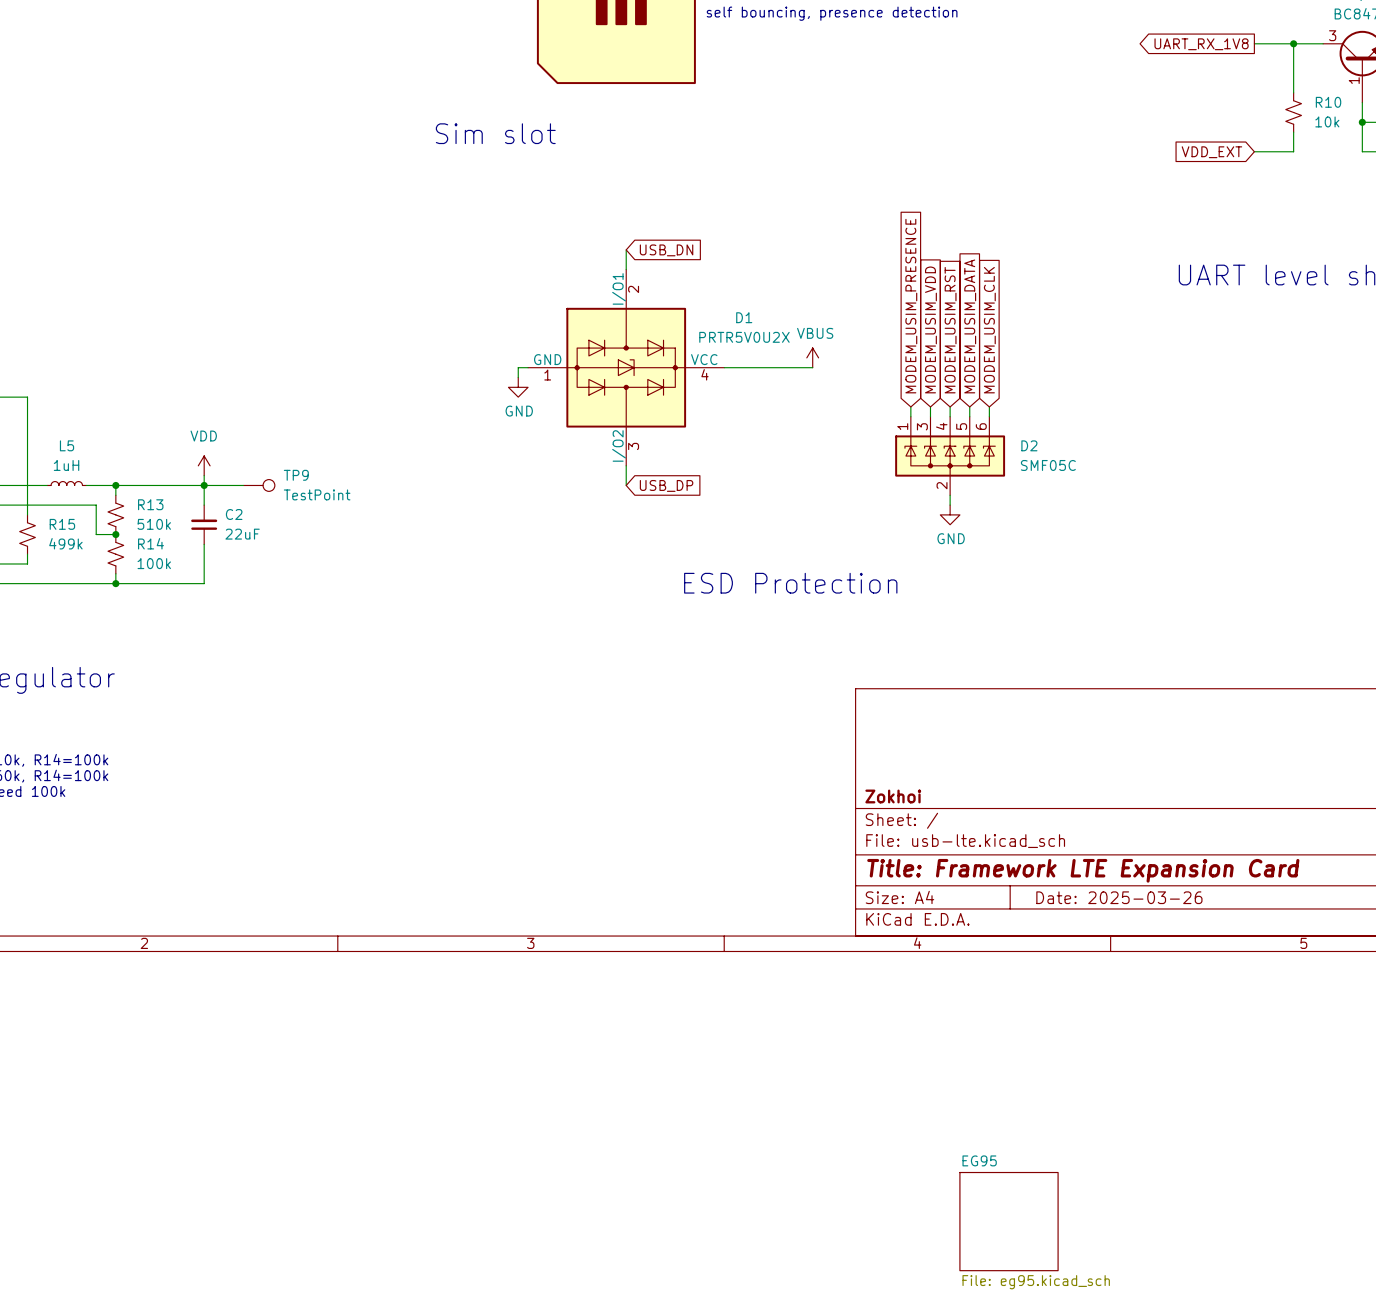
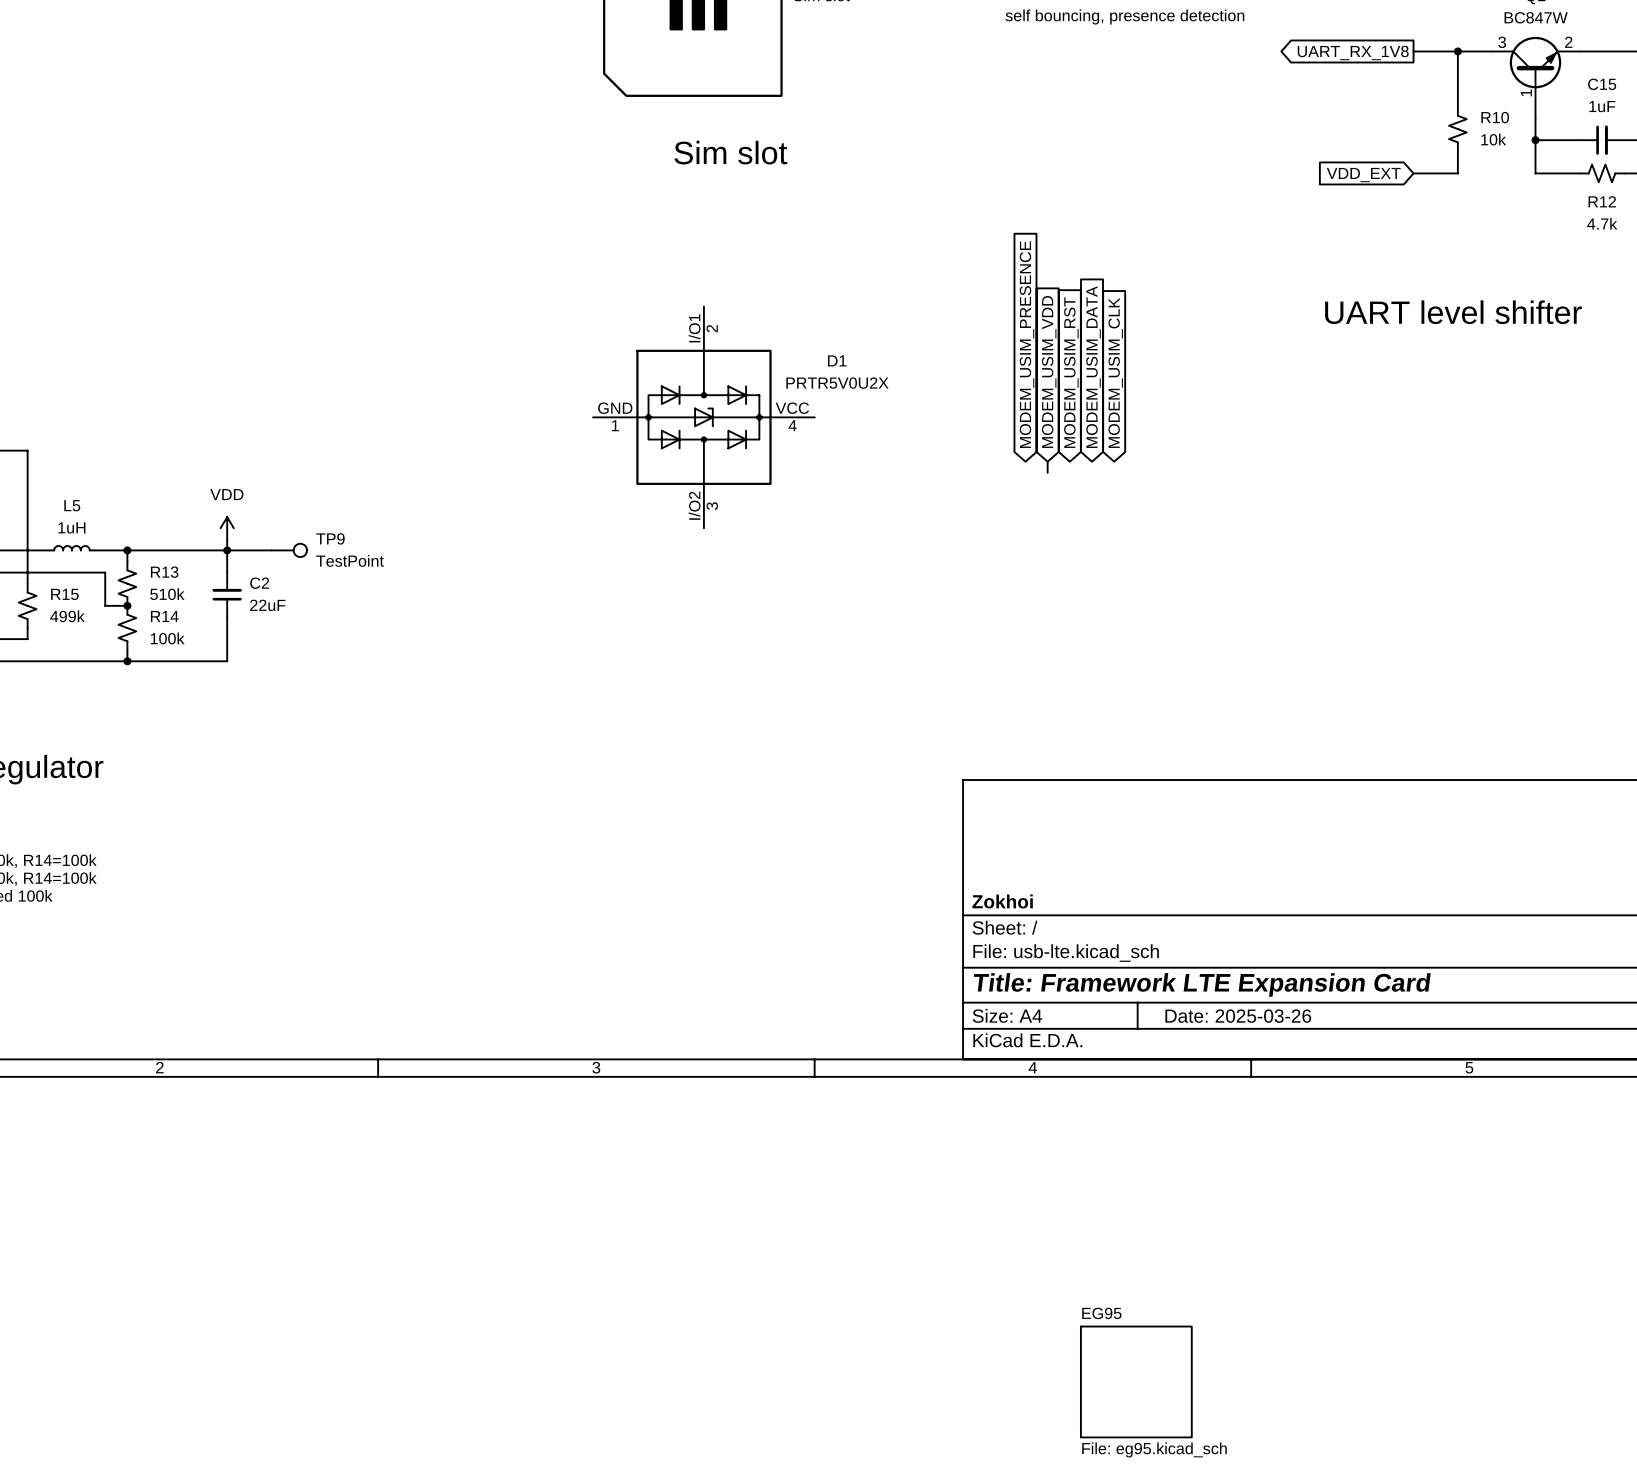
text position: self bouncing, presence detection (832, 13) -> self bouncing, presence detection (1124, 17)
text position: Sim slot (495, 133) -> Sim slot (730, 152)
wire: (626, 249) (626, 269) -> none
global label: USB_DN (666, 250) -> none
power symbol: VBUS (812, 357) -> none
wire: (528, 367) (518, 367) (518, 377) -> none
wire: (724, 367) (812, 367) -> none
power symbol: GND (518, 387) -> none
wire: (910, 406) (910, 416) -> none
wire: (950, 406) (950, 416) -> none
wire: (969, 406) (969, 416) -> none
wire: (989, 406) (989, 416) -> none
D2: SMF05C (950, 456) -> none
wire: (626, 465) (626, 485) -> none
global label: USB_DP (666, 485) -> none
wire: (950, 495) (950, 505) -> none
power symbol: GND (950, 514) -> none
text: ESD Protection (790, 583) -> none

